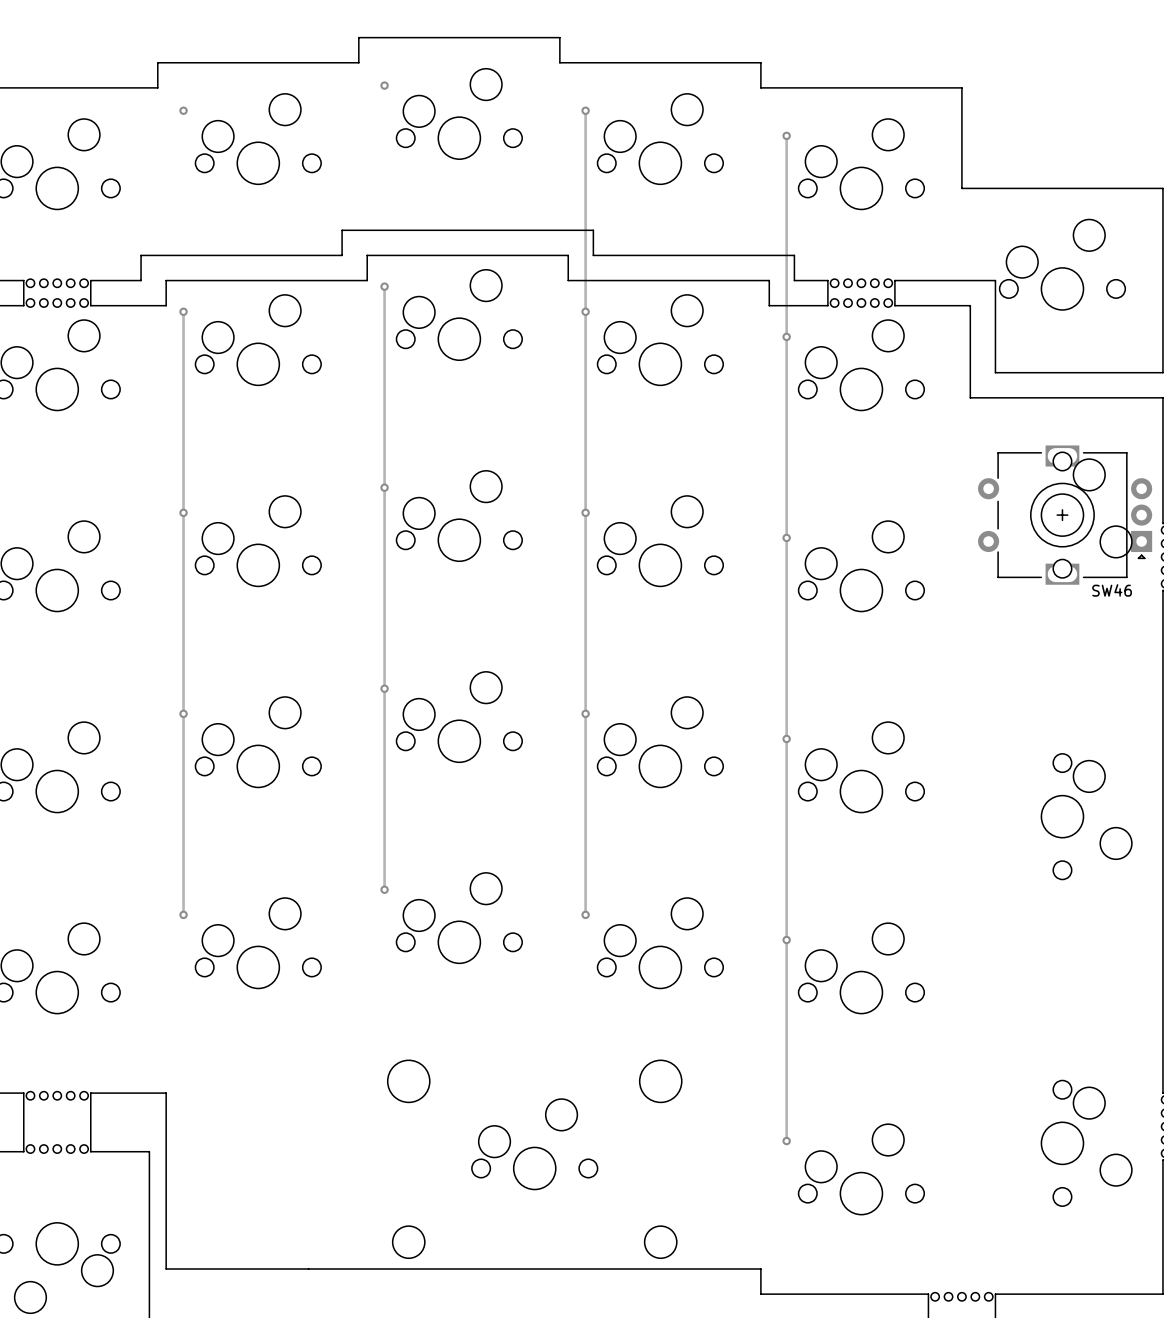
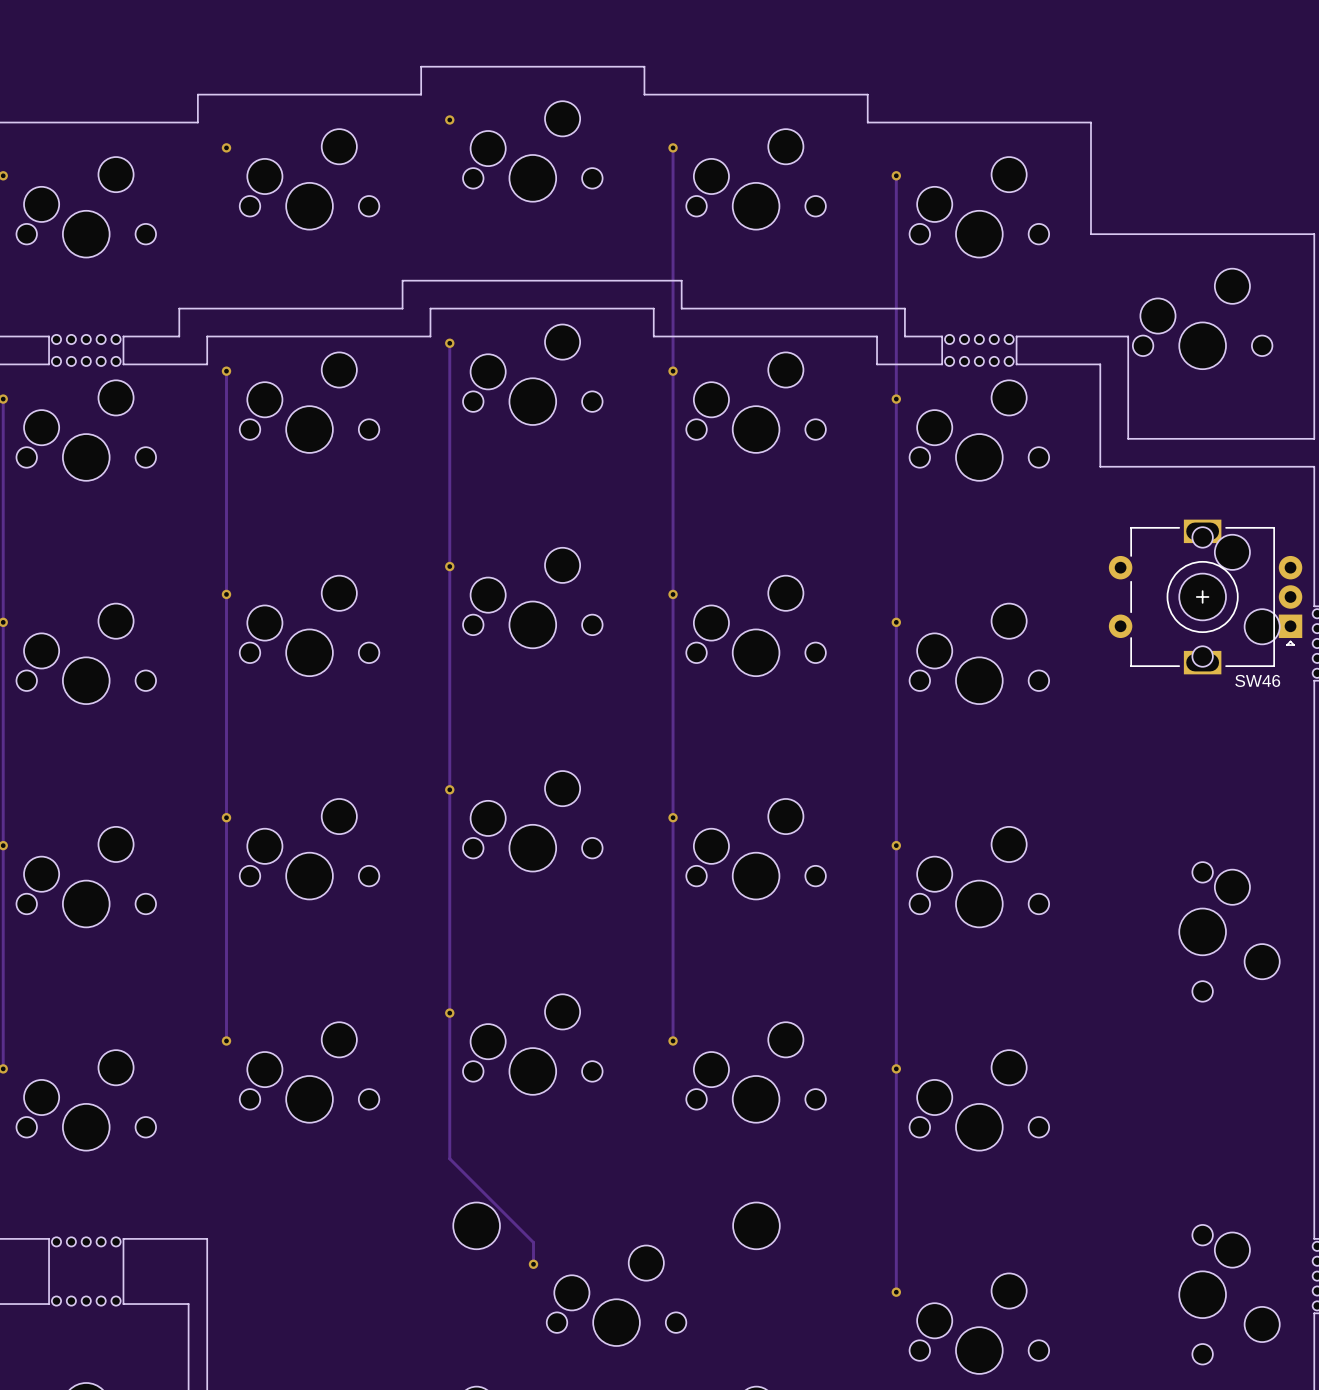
track: none -> (449, 1013) (449, 1158) (533, 1242) (533, 1264)
via: none -> (533, 1264)

